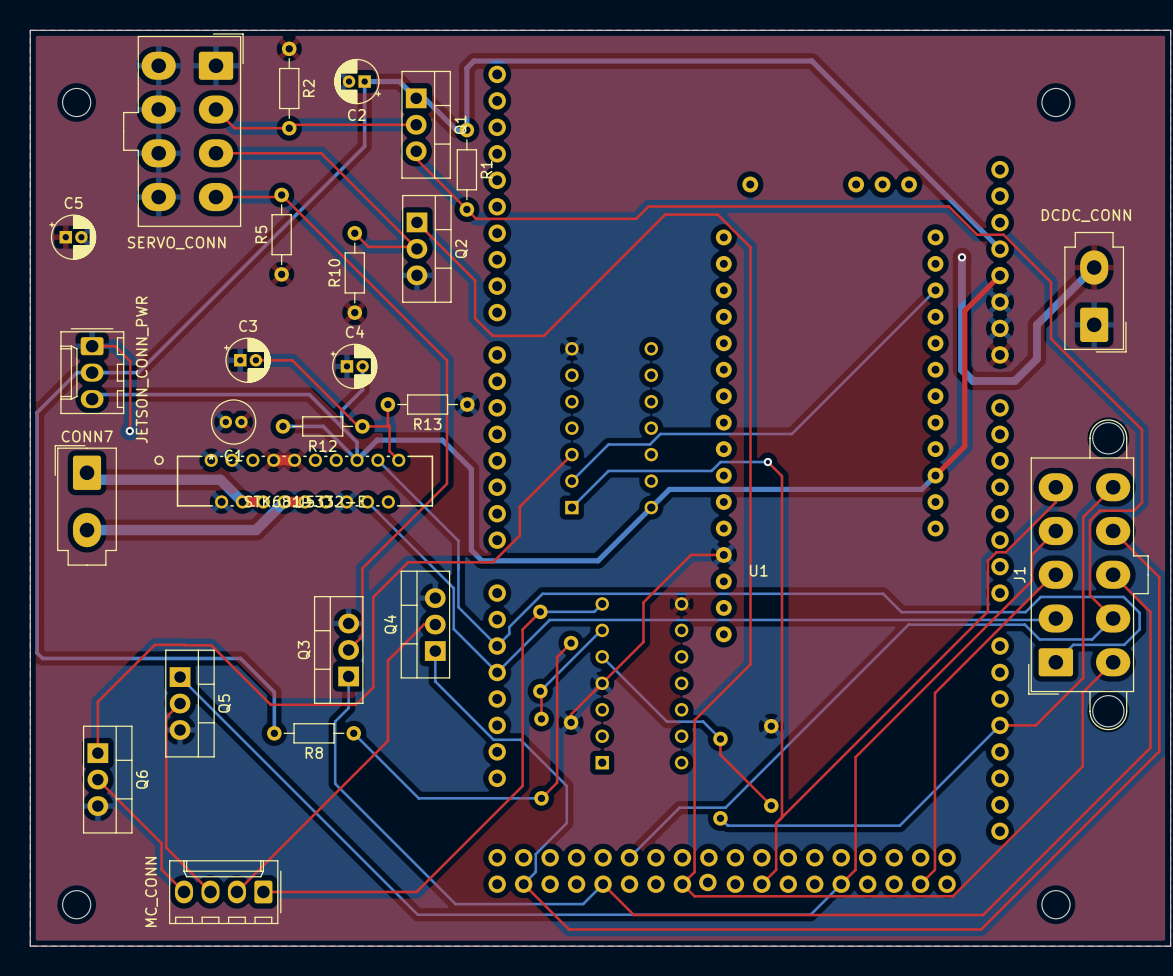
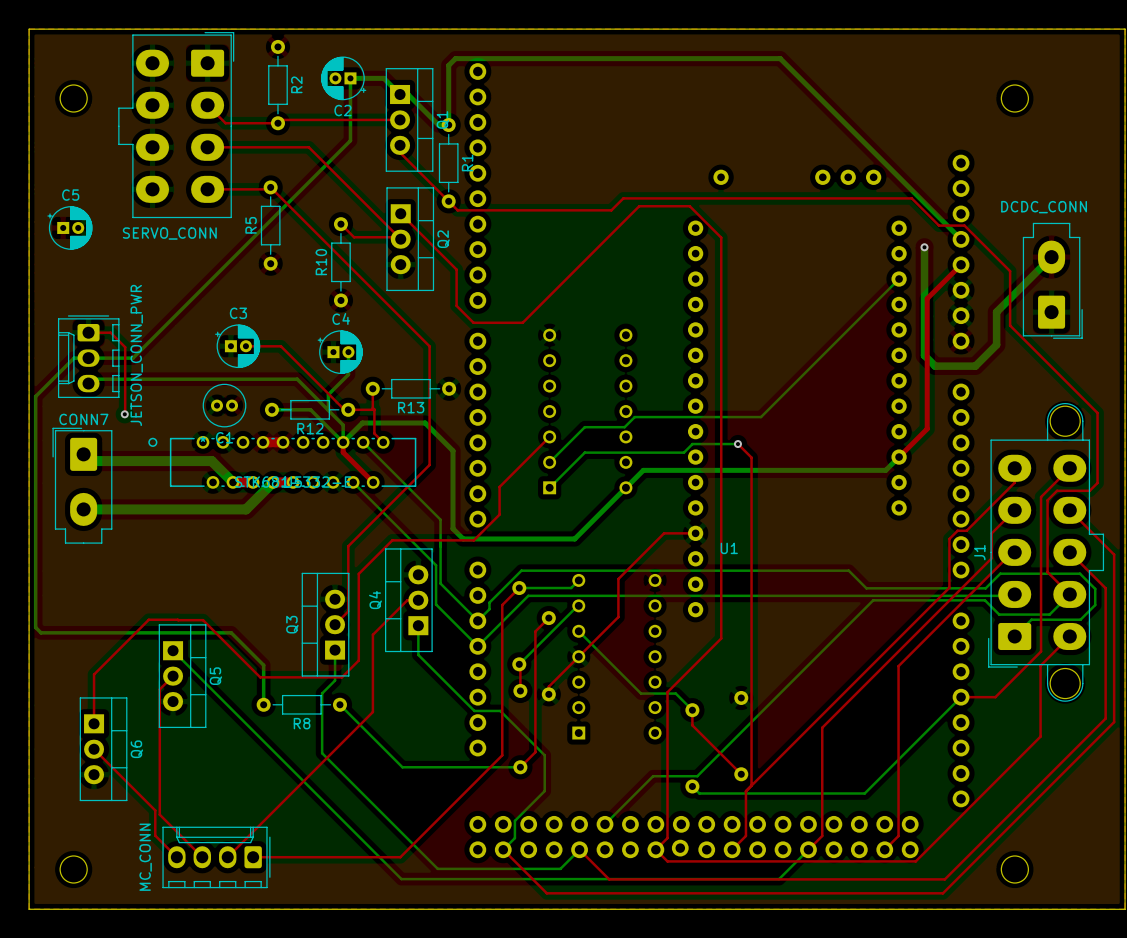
top track: none -> (343, 442) (343, 452) (373, 482)

